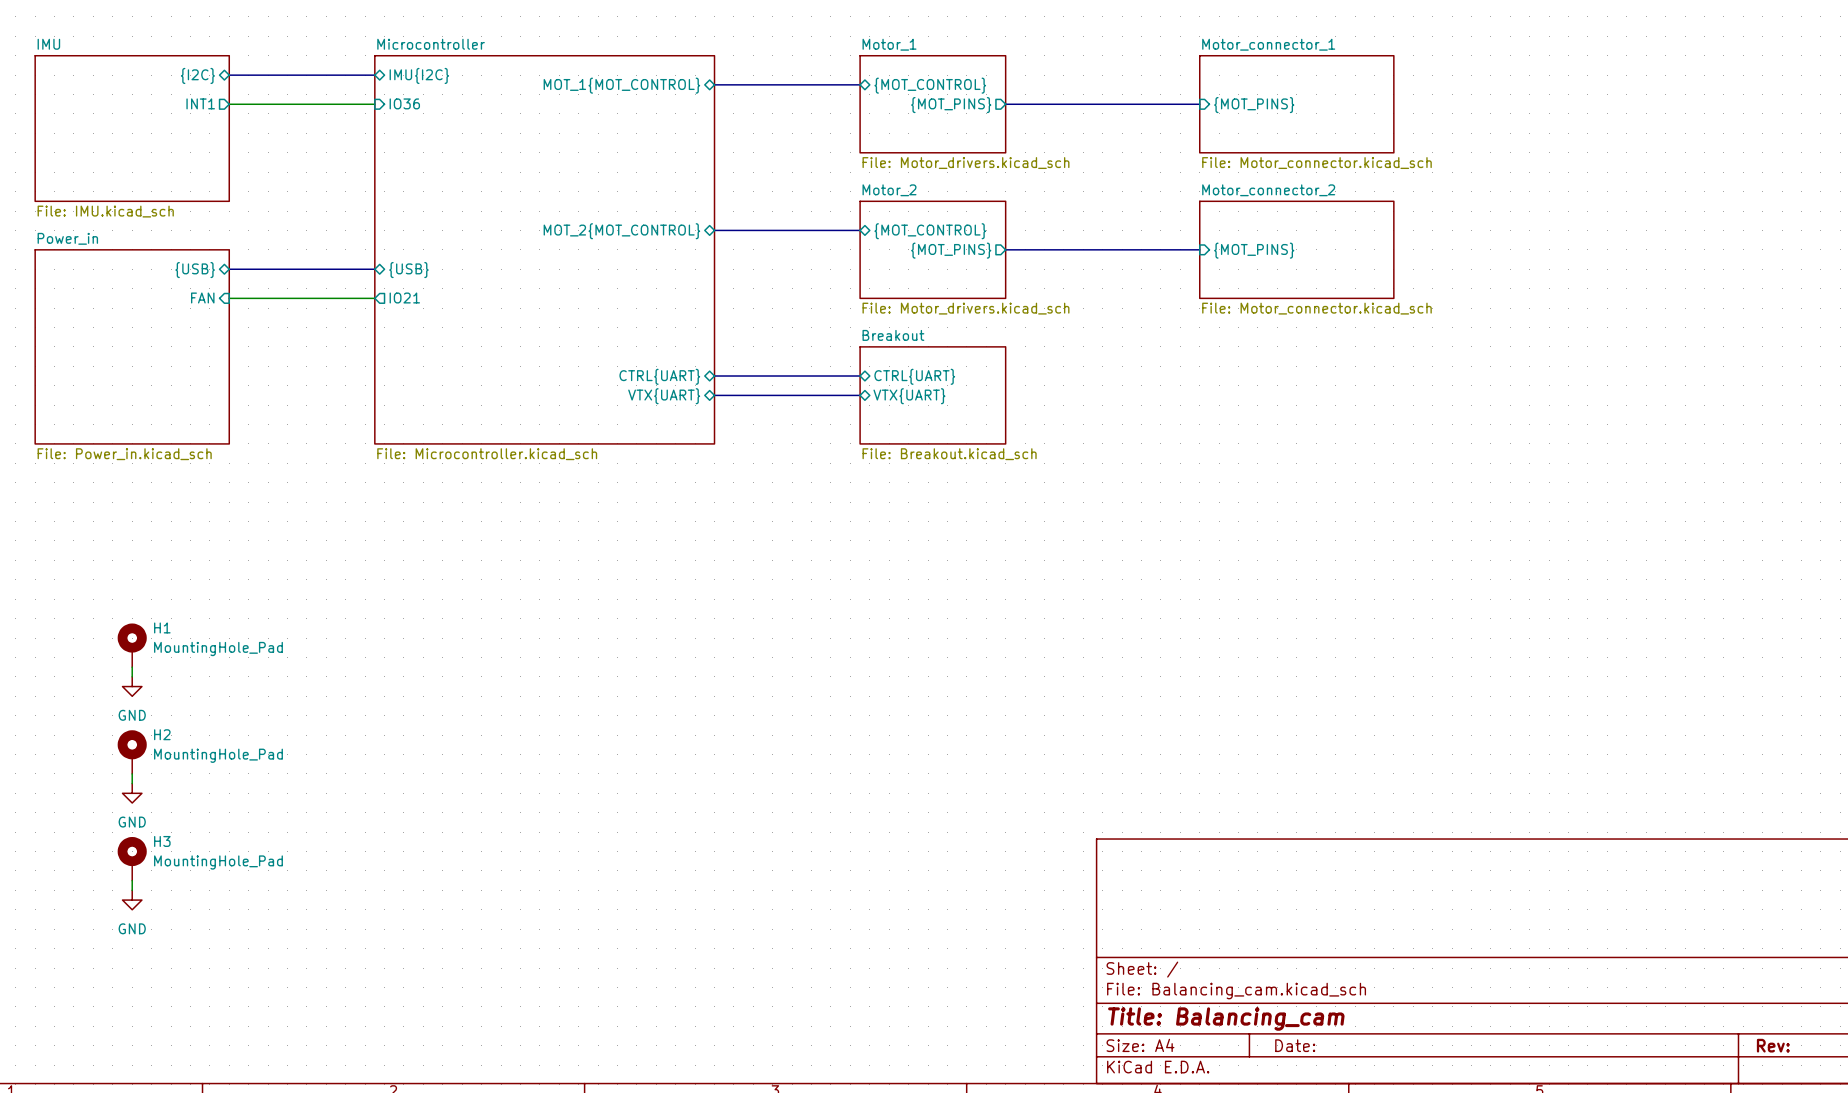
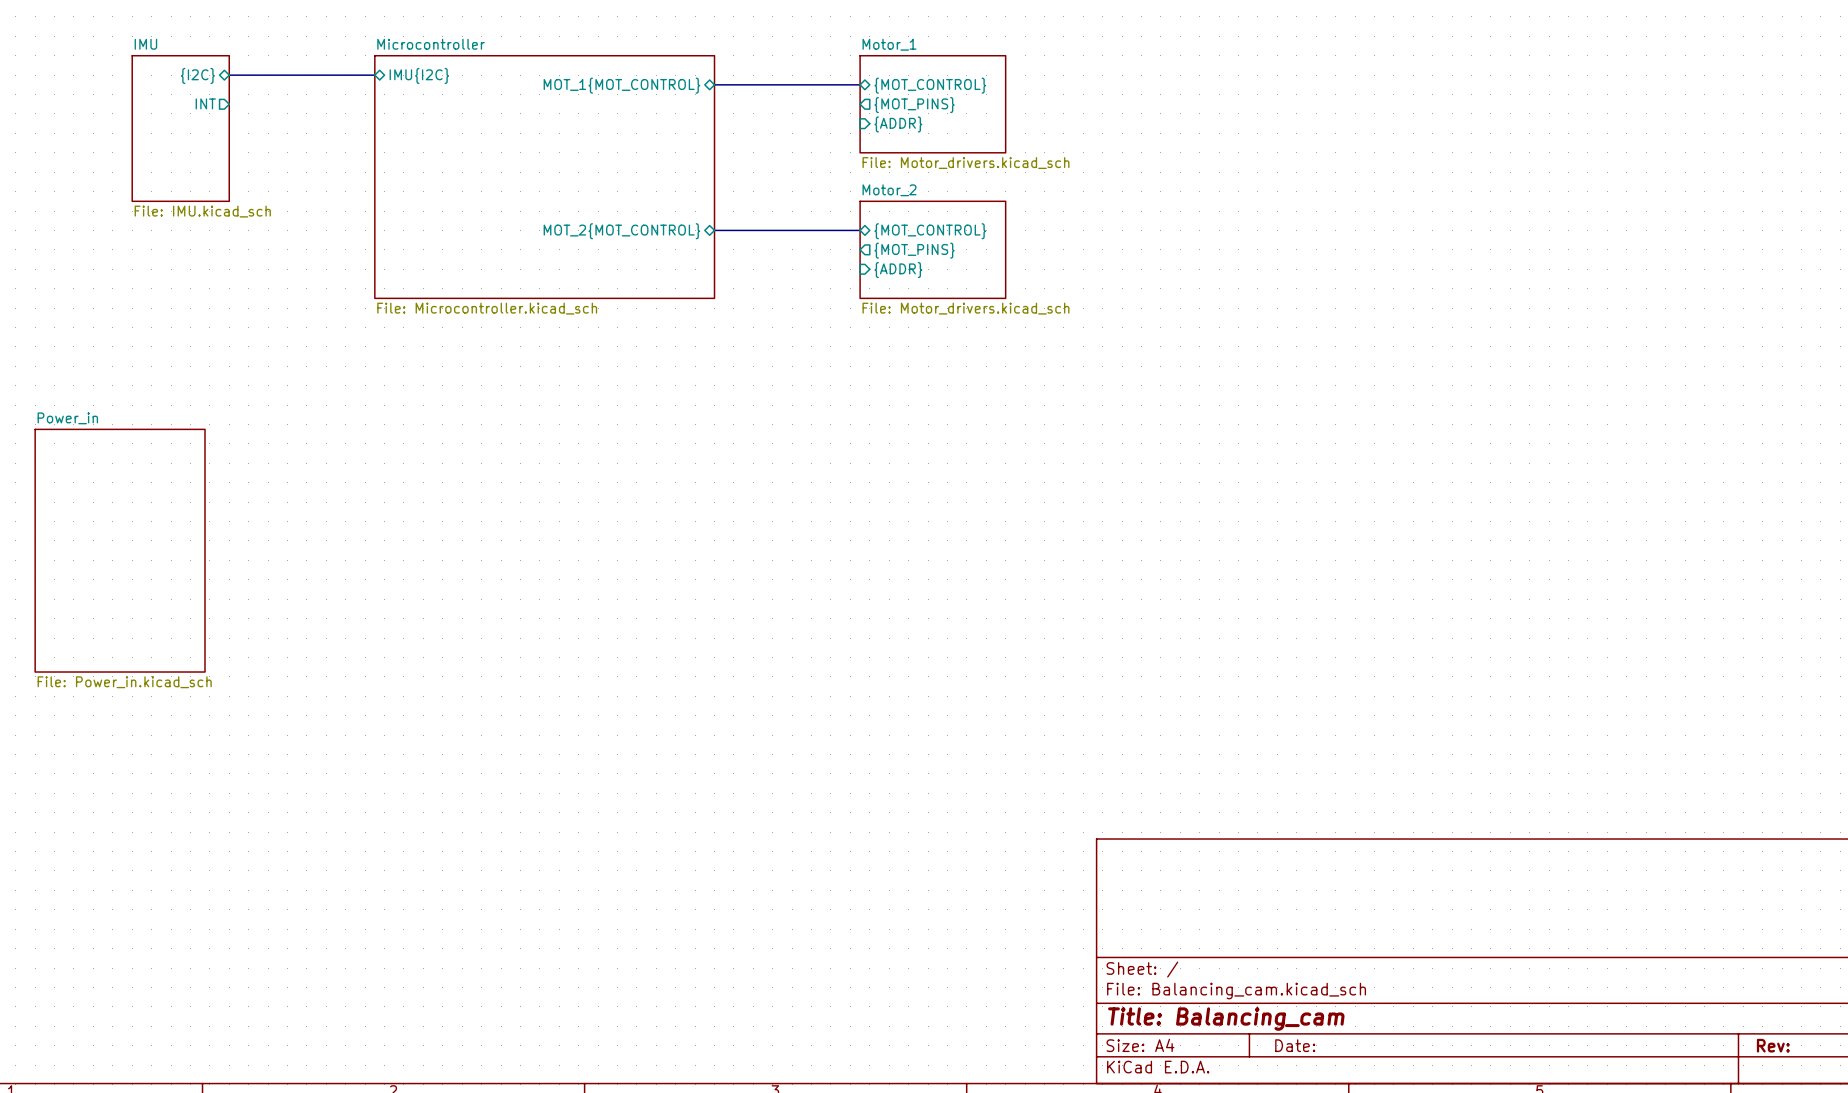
sheet pin: INT1 (200, 103) -> INT (205, 103)
sheet pin: IO36 (404, 103) -> none
wire: (229, 104) (374, 104) -> none
bus: (1005, 104) (1199, 104) -> none
sheet Motor_connector_1: File: Motor_connector.kicad_sch (1296, 104) -> none
sheet pin rotation: 0° (951, 105) -> 180° (914, 105)
sheet pin: {MOT_PINS} (1254, 105) -> none
sheet pin: none -> {ADDR} (898, 124)
sheet IMU: File: IMU.kicad_sch (132, 128) -> none
sheet IMU: none -> File: IMU.kicad_sch (180, 128)
sheet Microcontroller: none -> File: Microcontroller.kicad_sch (544, 177)
sheet Microcontroller: File: Microcontroller.kicad_sch (544, 249) -> none
bus: (1005, 249) (1199, 249) -> none
sheet Motor_connector_2: File: Motor_connector.kicad_sch (1296, 249) -> none
sheet pin rotation: 0° (951, 250) -> 180° (914, 250)
sheet pin: {MOT_PINS} (1254, 250) -> none
bus: (229, 269) (374, 269) -> none
sheet pin: {USB} (195, 270) -> none
sheet pin: {USB} (408, 270) -> none
sheet pin: none -> {ADDR} (898, 270)
sheet pin: FAN (202, 298) -> none
wire: (229, 298) (374, 298) -> none
sheet pin: IO21 (404, 298) -> none
sheet Power_in: File: Power_in.kicad_sch (132, 346) -> none
sheet pin: CTRL{UART} (659, 376) -> none
bus: (714, 376) (860, 376) -> none
sheet pin: CTRL{UART} (914, 376) -> none
bus: (714, 395) (860, 395) -> none
sheet Breakout: File: Breakout.kicad_sch (932, 395) -> none
sheet pin: VTX{UART} (664, 396) -> none
sheet pin: VTX{UART} (909, 396) -> none
sheet Power_in: none -> File: Power_in.kicad_sch (120, 550)
H1: MountingHole_Pad (132, 645) -> none
wire: (132, 667) (132, 676) -> none
power symbol: GND (132, 686) -> none
H2: MountingHole_Pad (132, 752) -> none
wire: (132, 773) (132, 783) -> none
power symbol: GND (132, 793) -> none
H3: MountingHole_Pad (132, 858) -> none
wire: (132, 880) (132, 890) -> none
power symbol: GND (132, 900) -> none

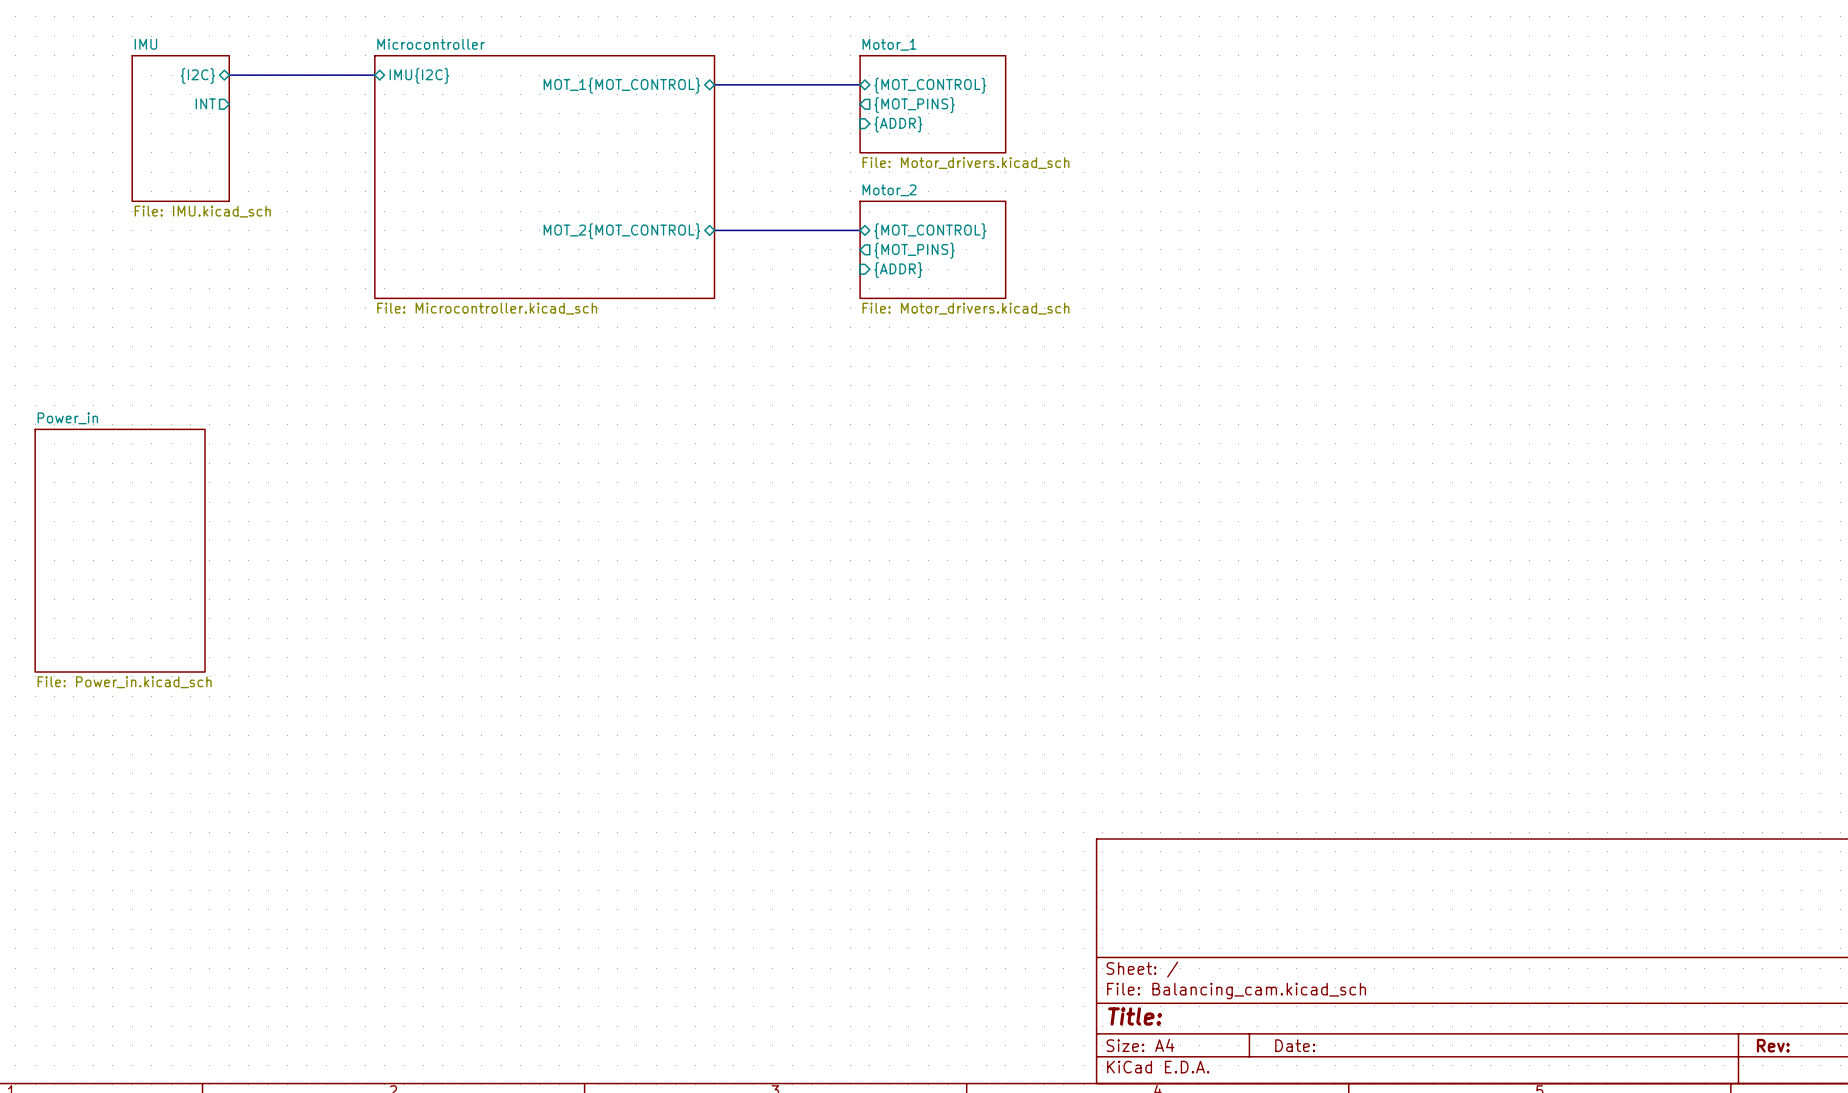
title block: Title: Balancing_cam (1226, 1019) -> Title: (1135, 1016)

